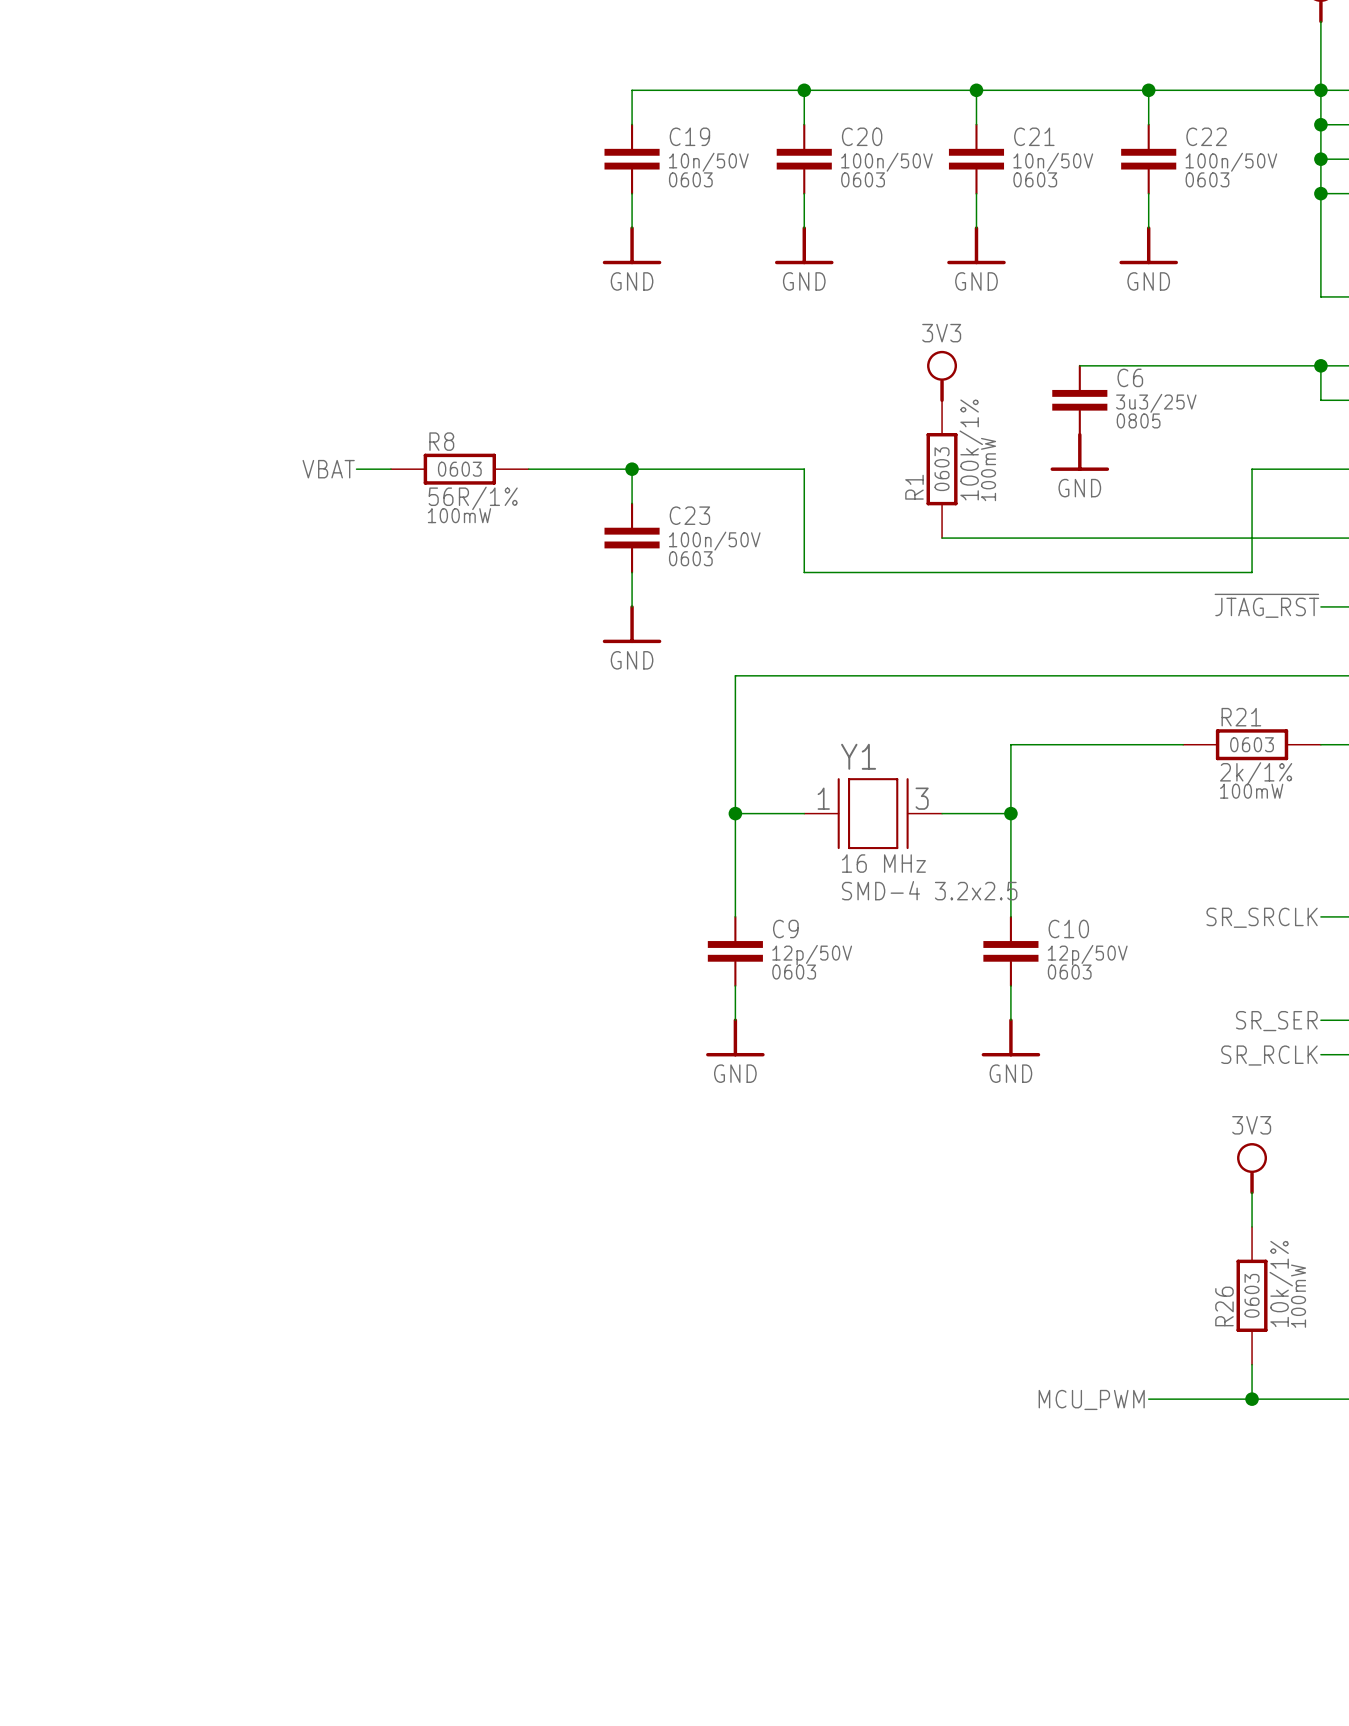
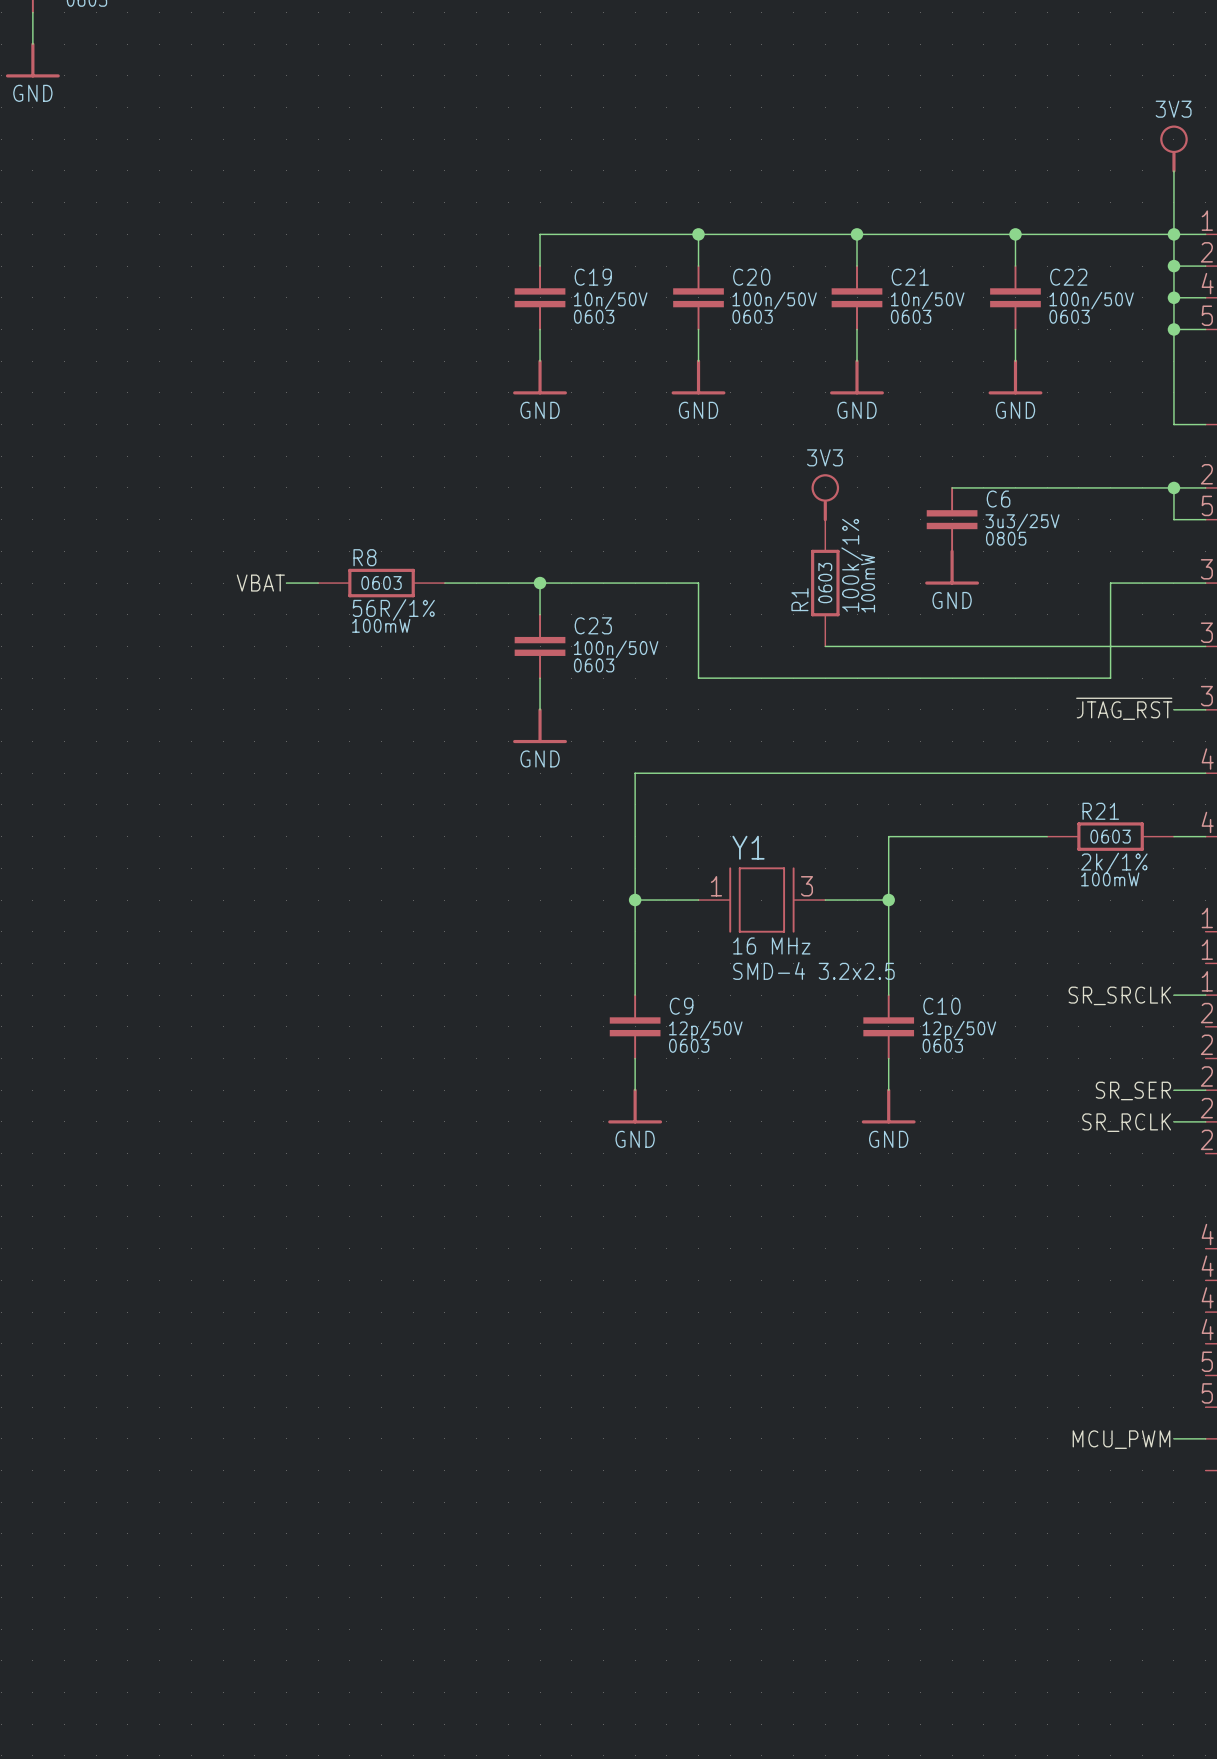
power symbol: 3V3 (1252, 1168) -> none
wire: (1252, 1192) (1252, 1226) -> none
R26: 10k/1% (1252, 1295) -> none
wire: (1252, 1364) (1252, 1399) -> none
label position: MCU_PWM (1091, 1399) -> MCU_PWM (1121, 1439)
wire: (1148, 1399) (1320, 1399) -> none
junction: (1252, 1399) -> none

